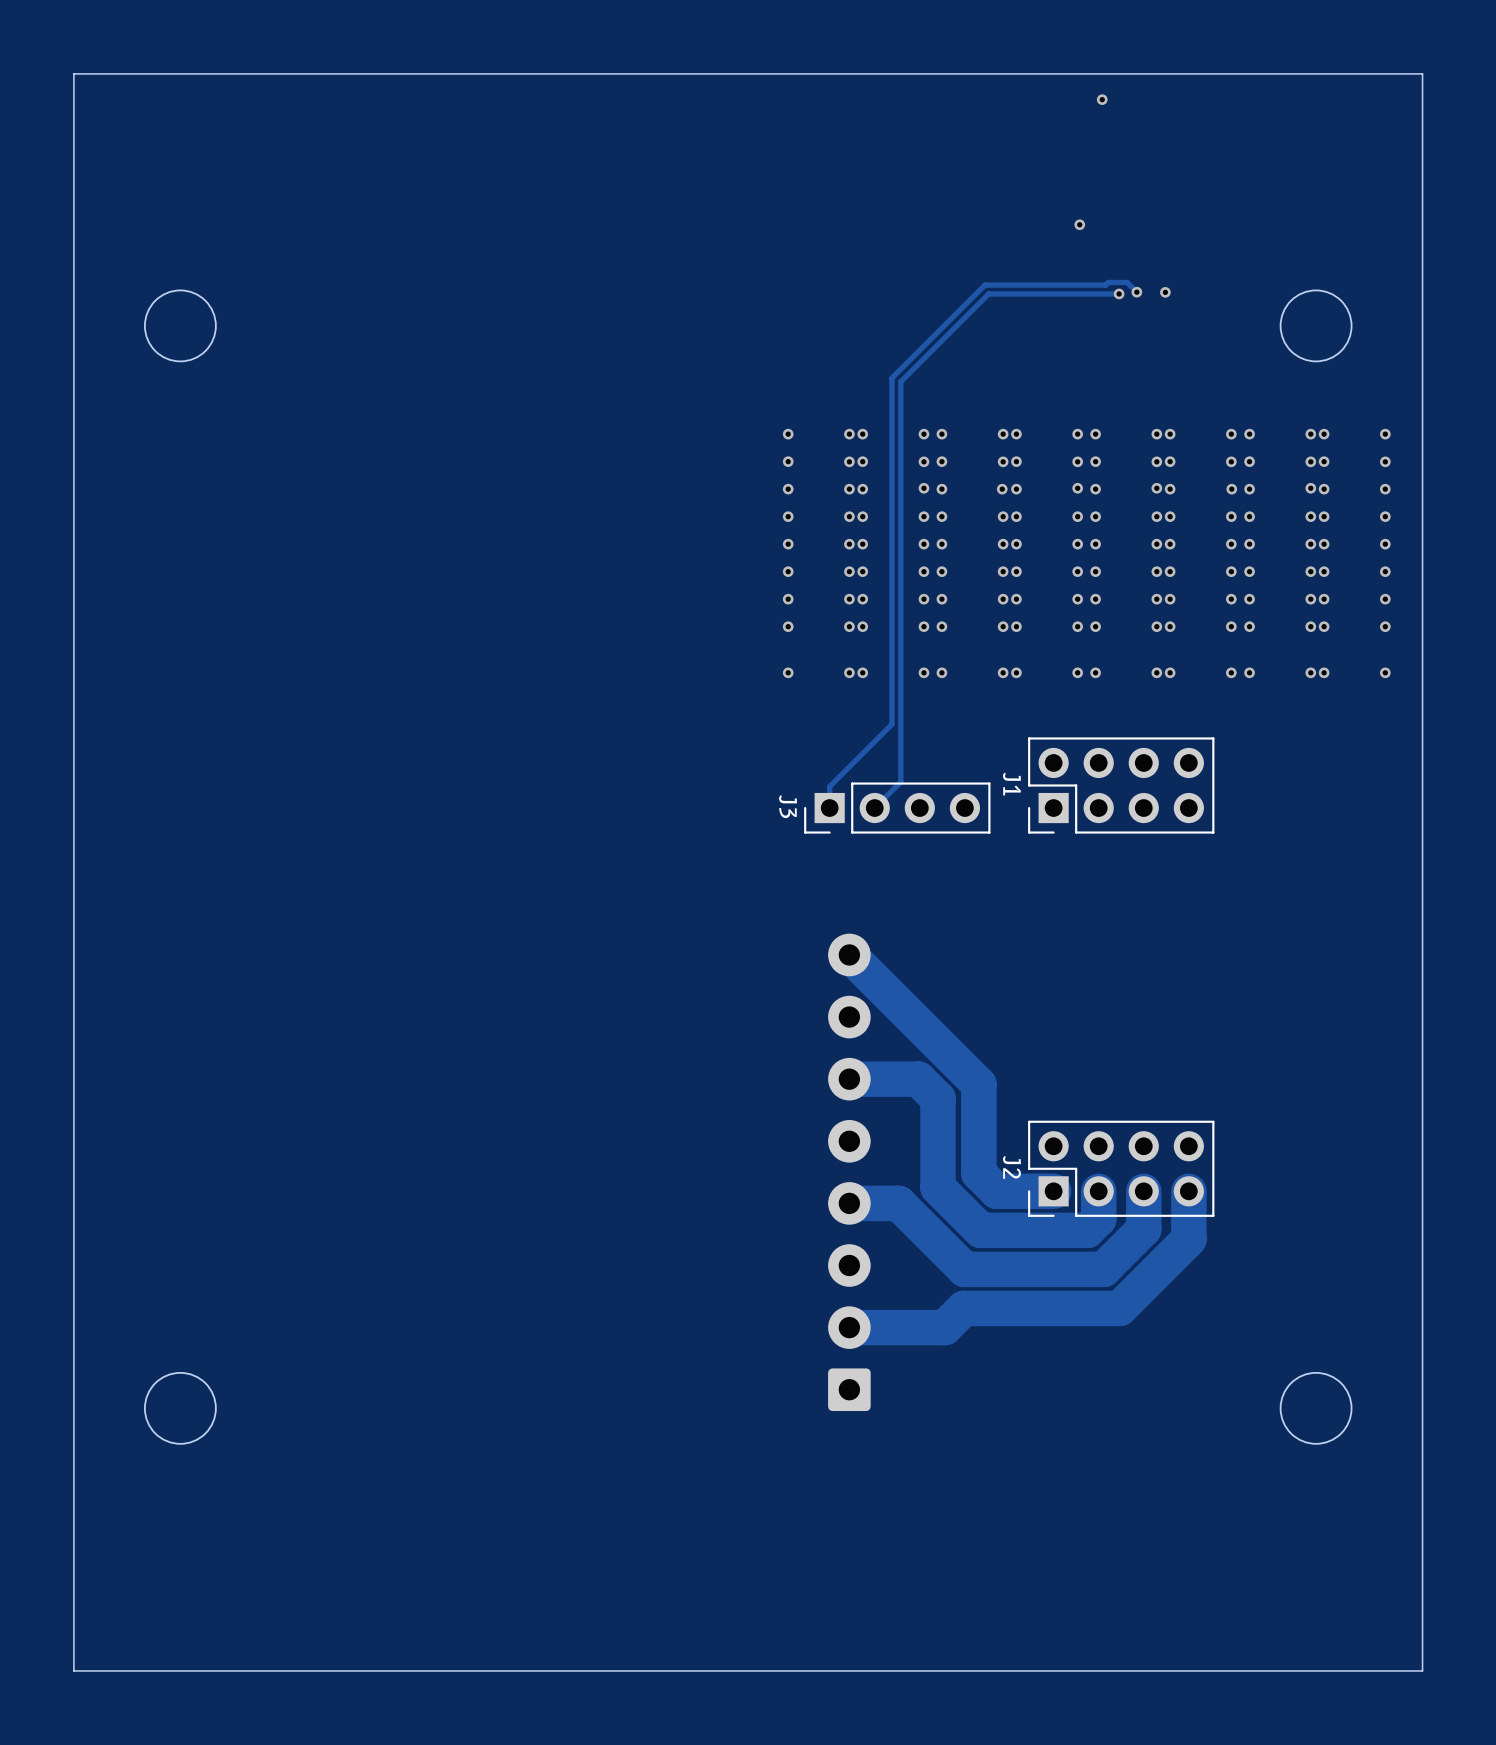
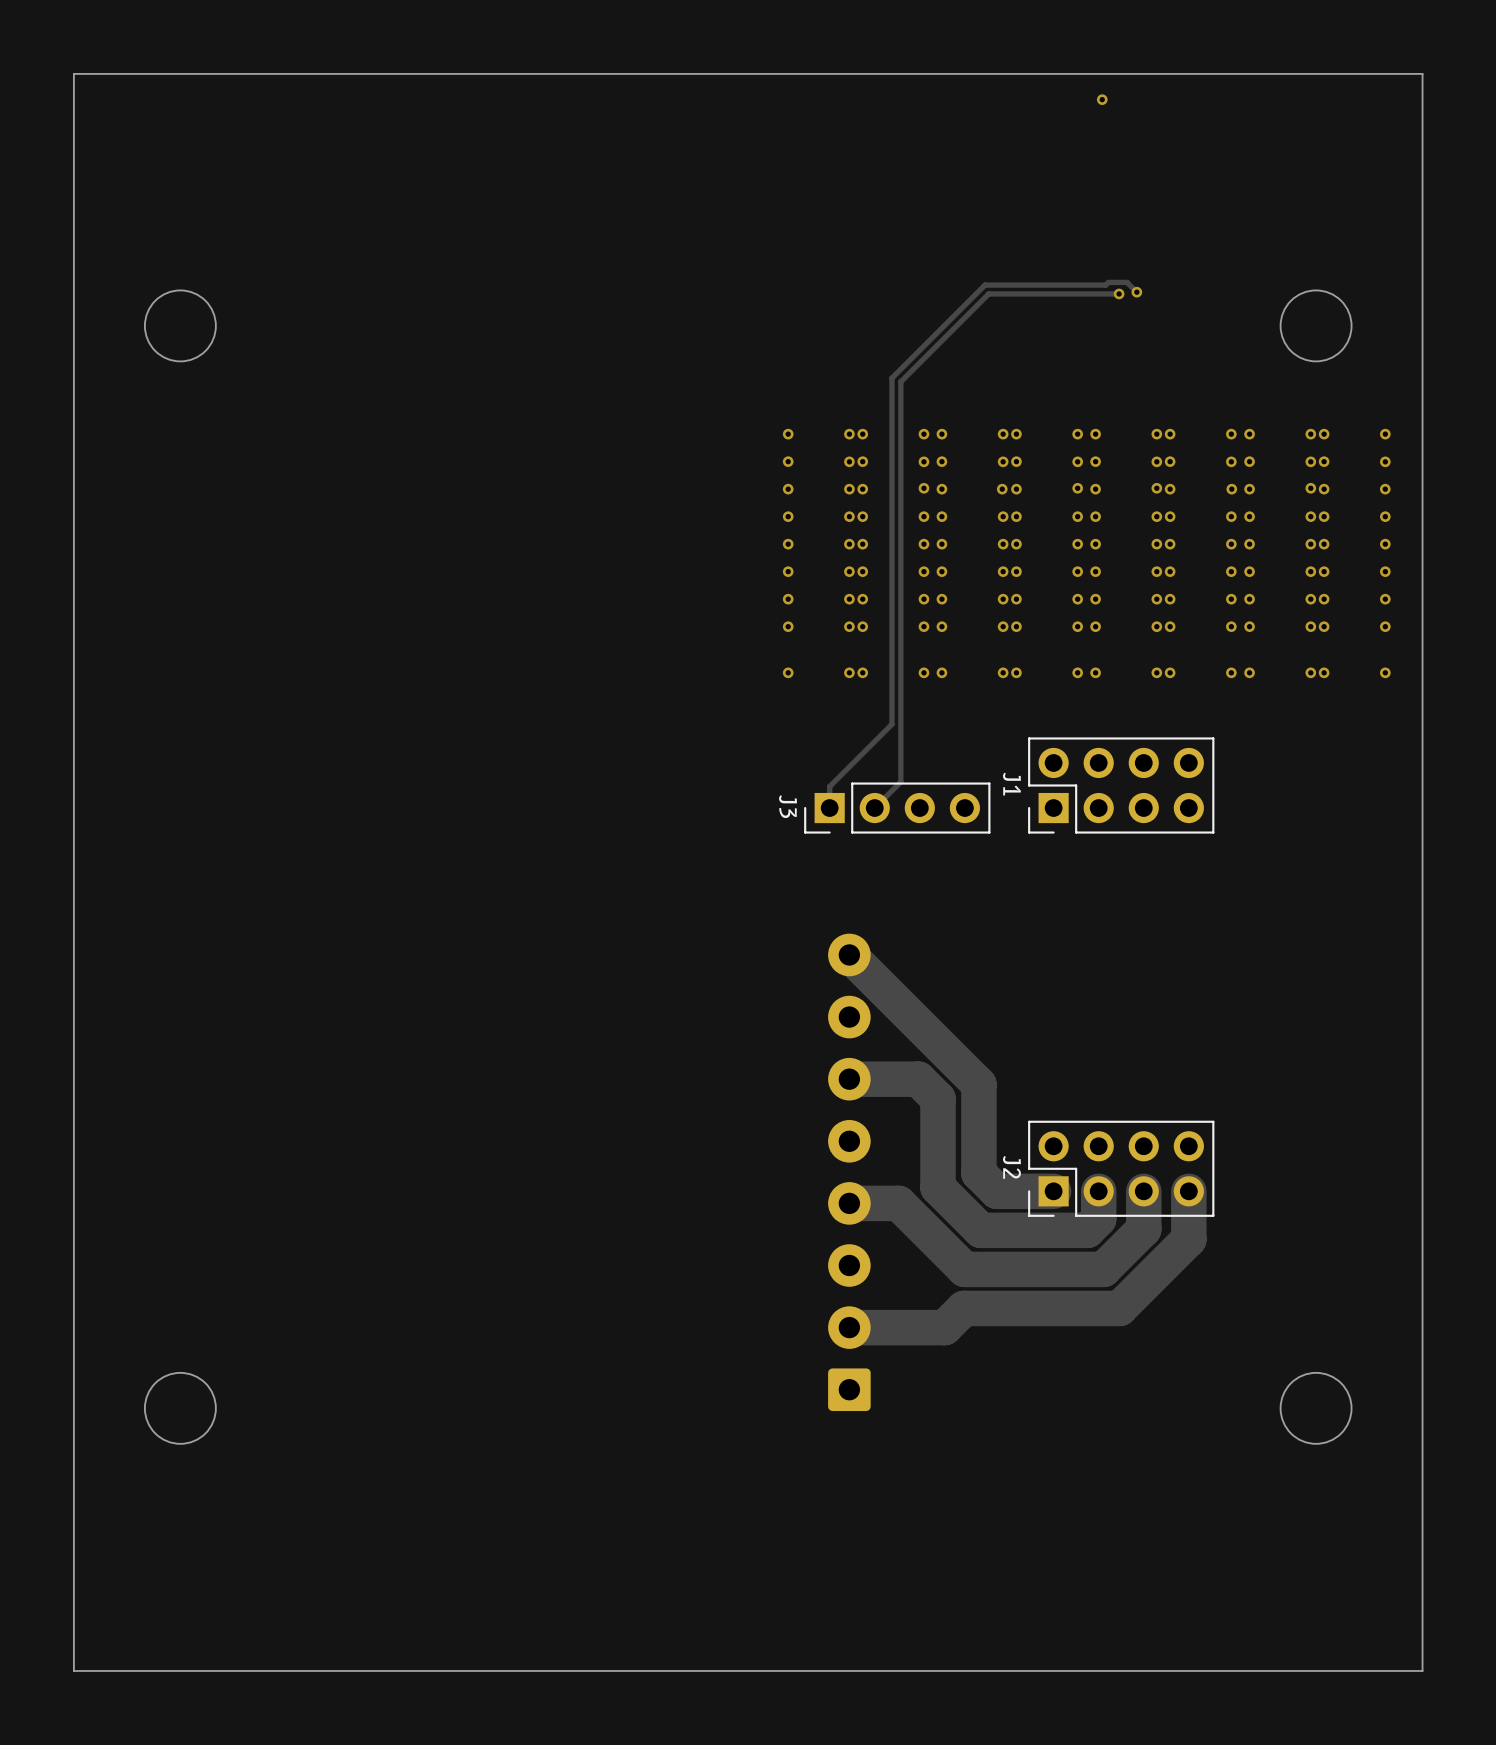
via: (1079, 224) -> none
via: (1165, 292) -> none

